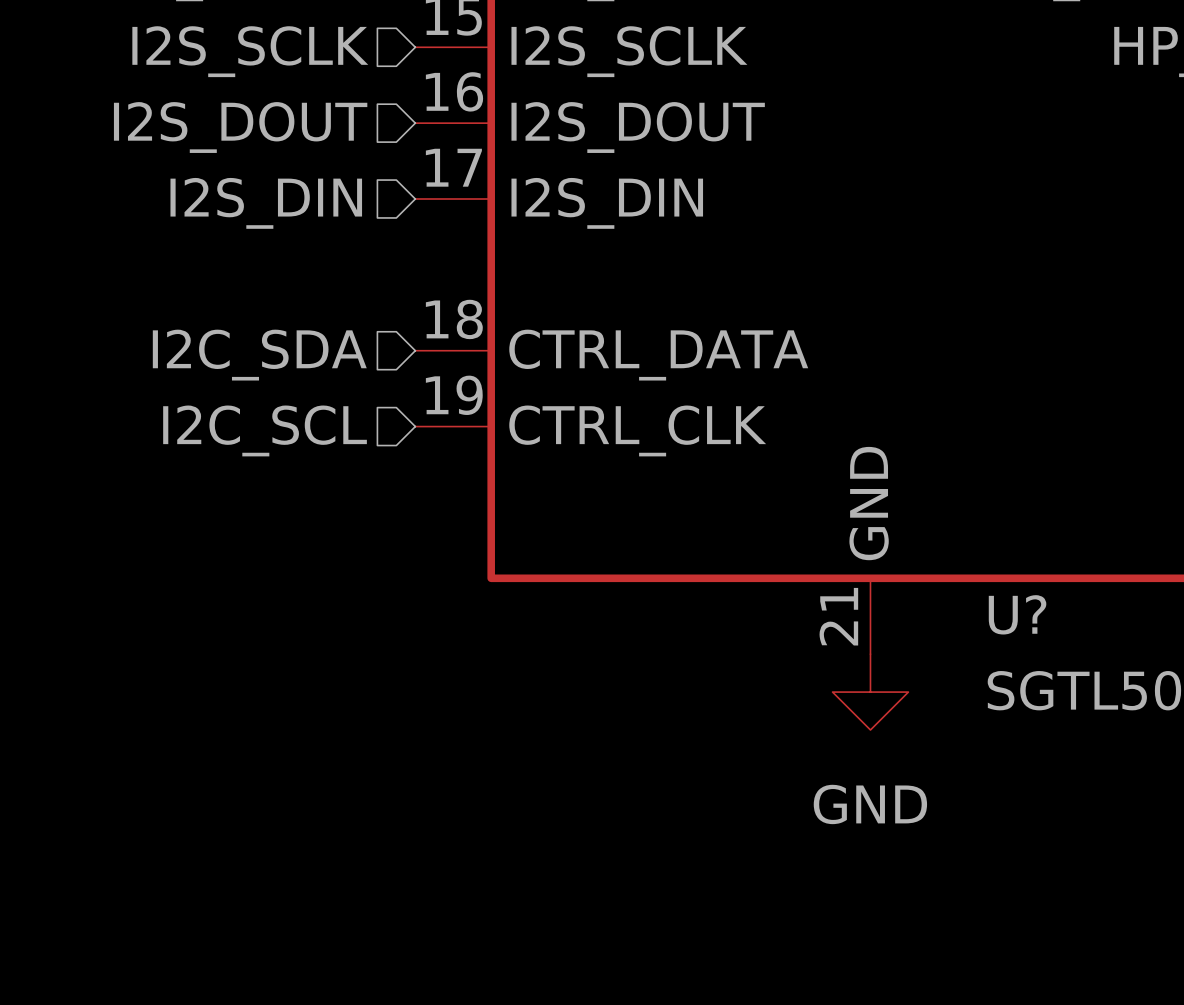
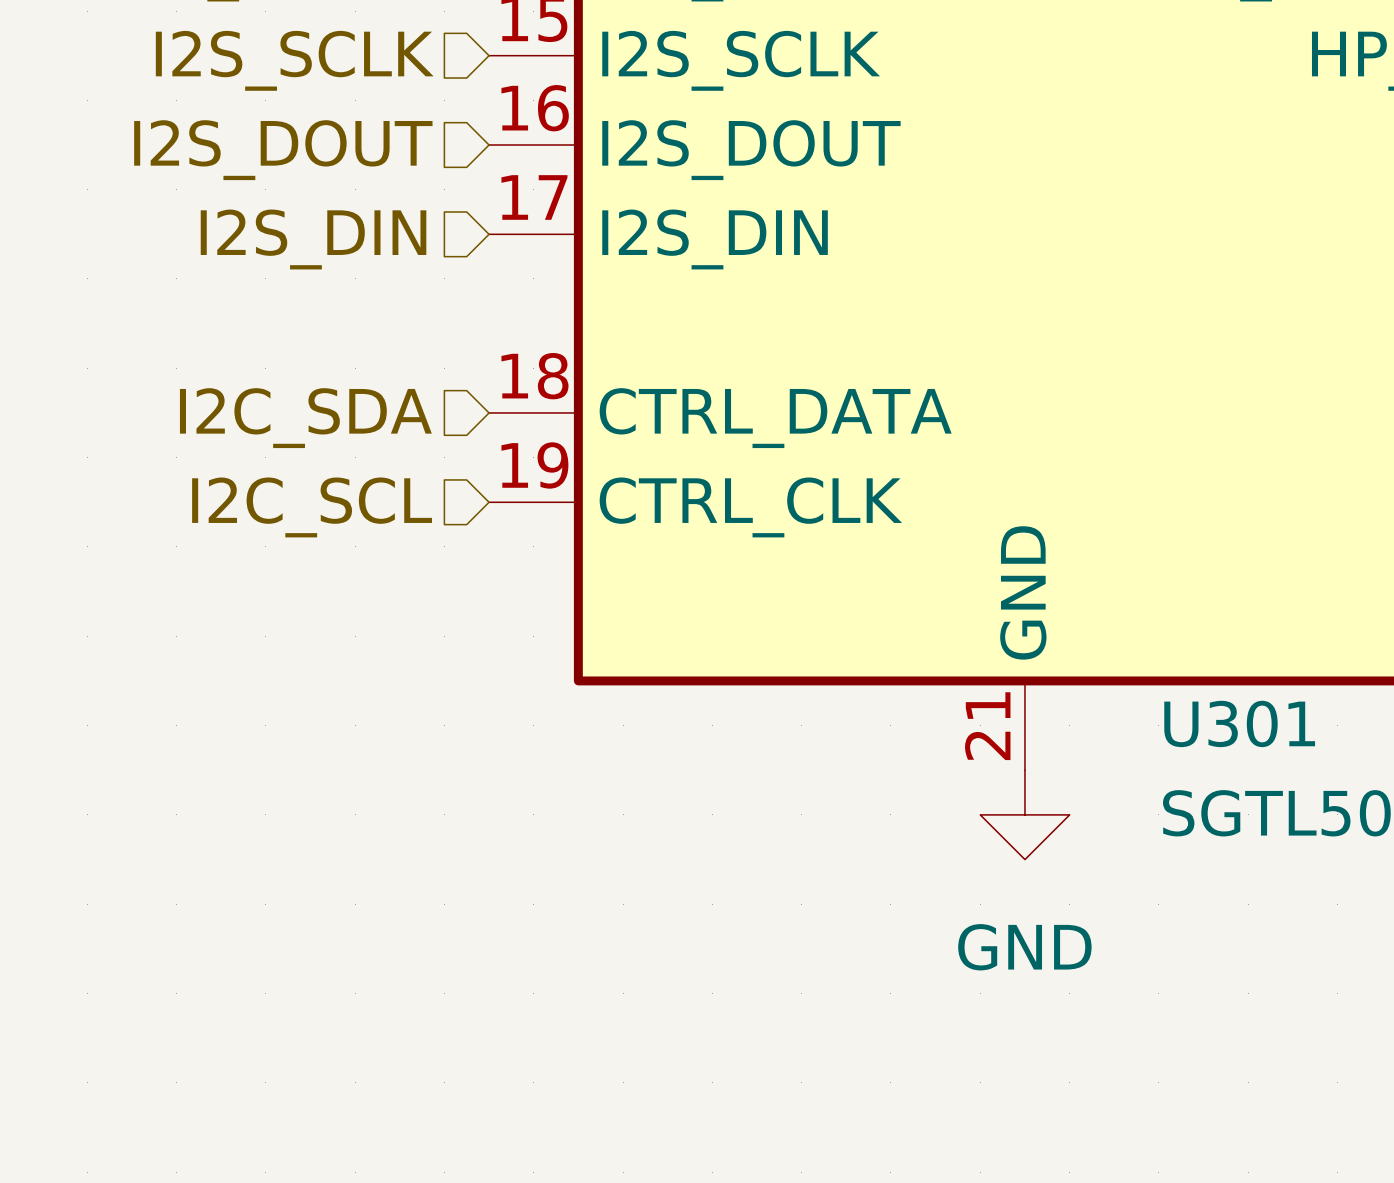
U? name: U? (1017, 614) -> U301 (1239, 723)

